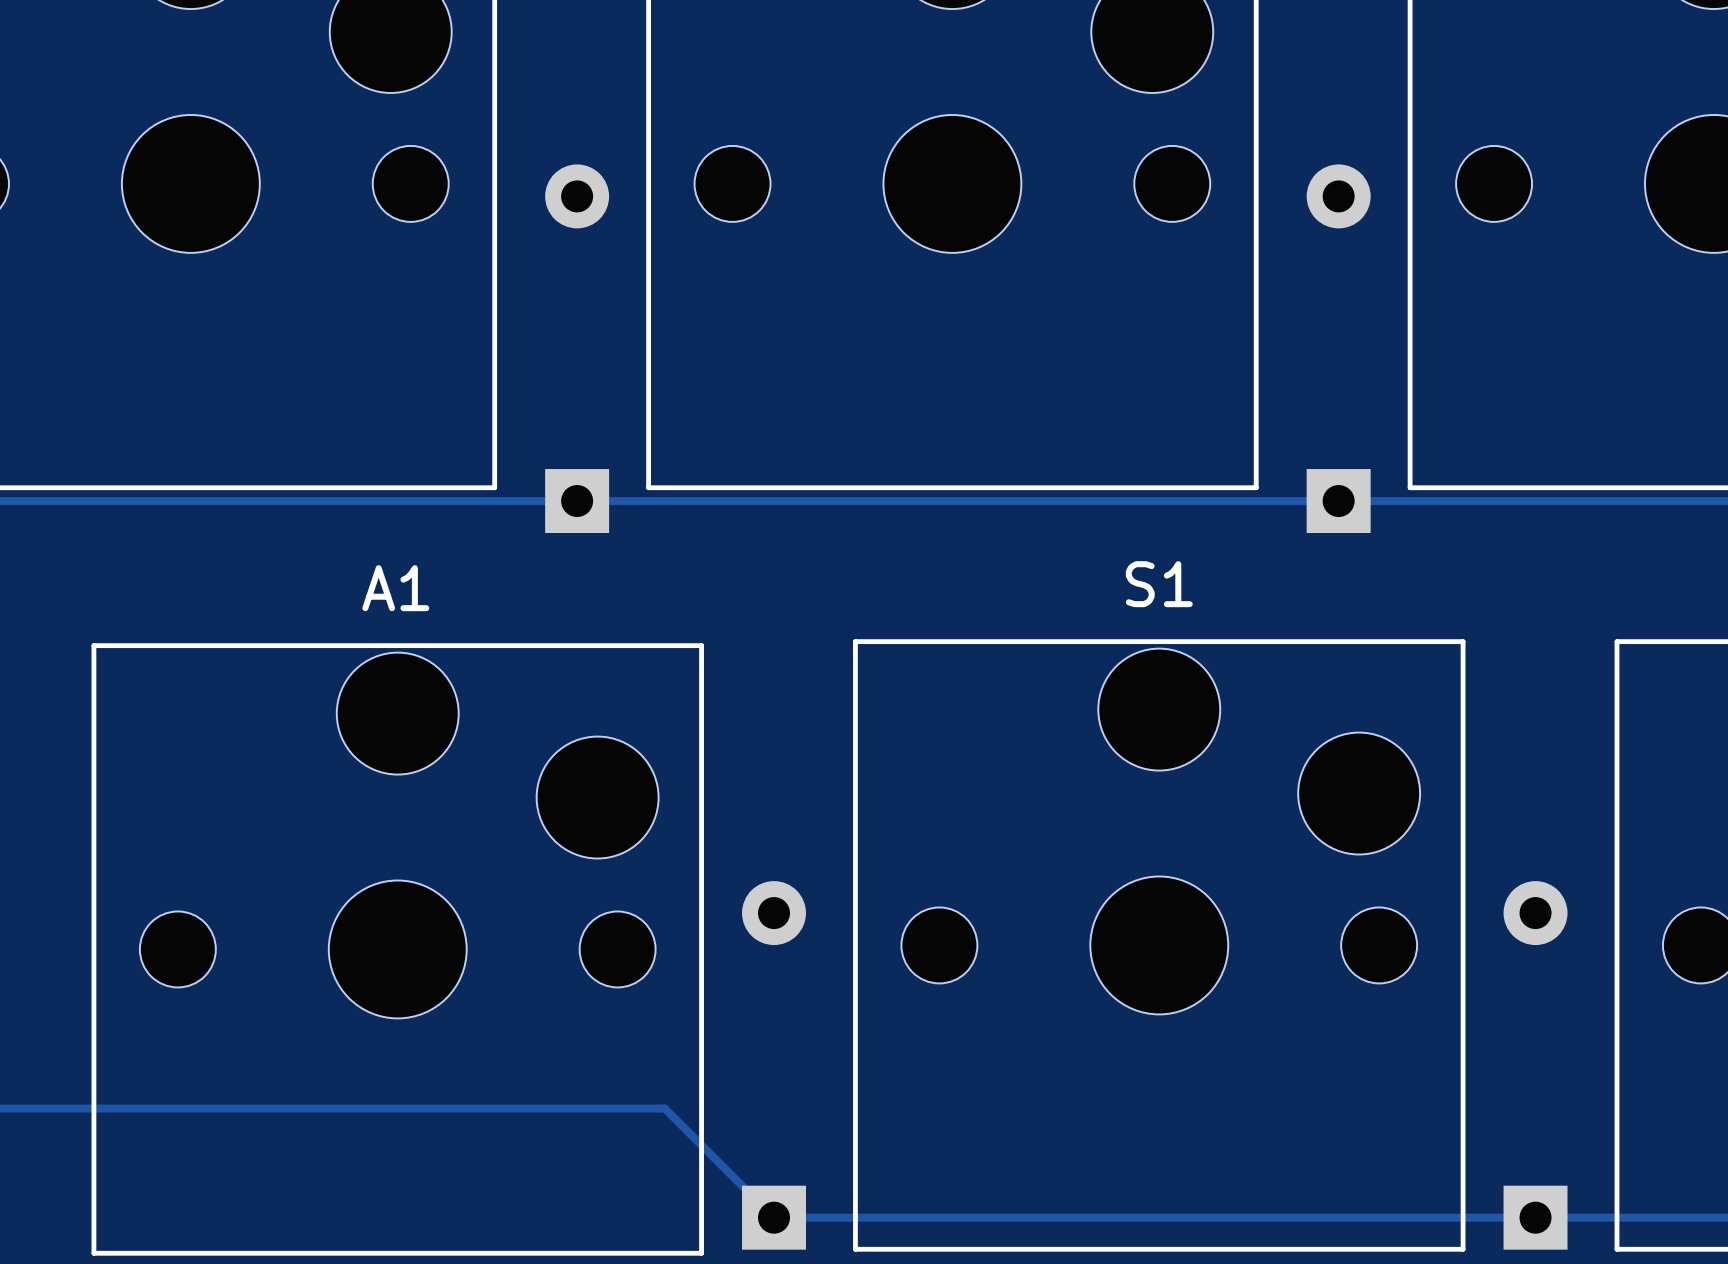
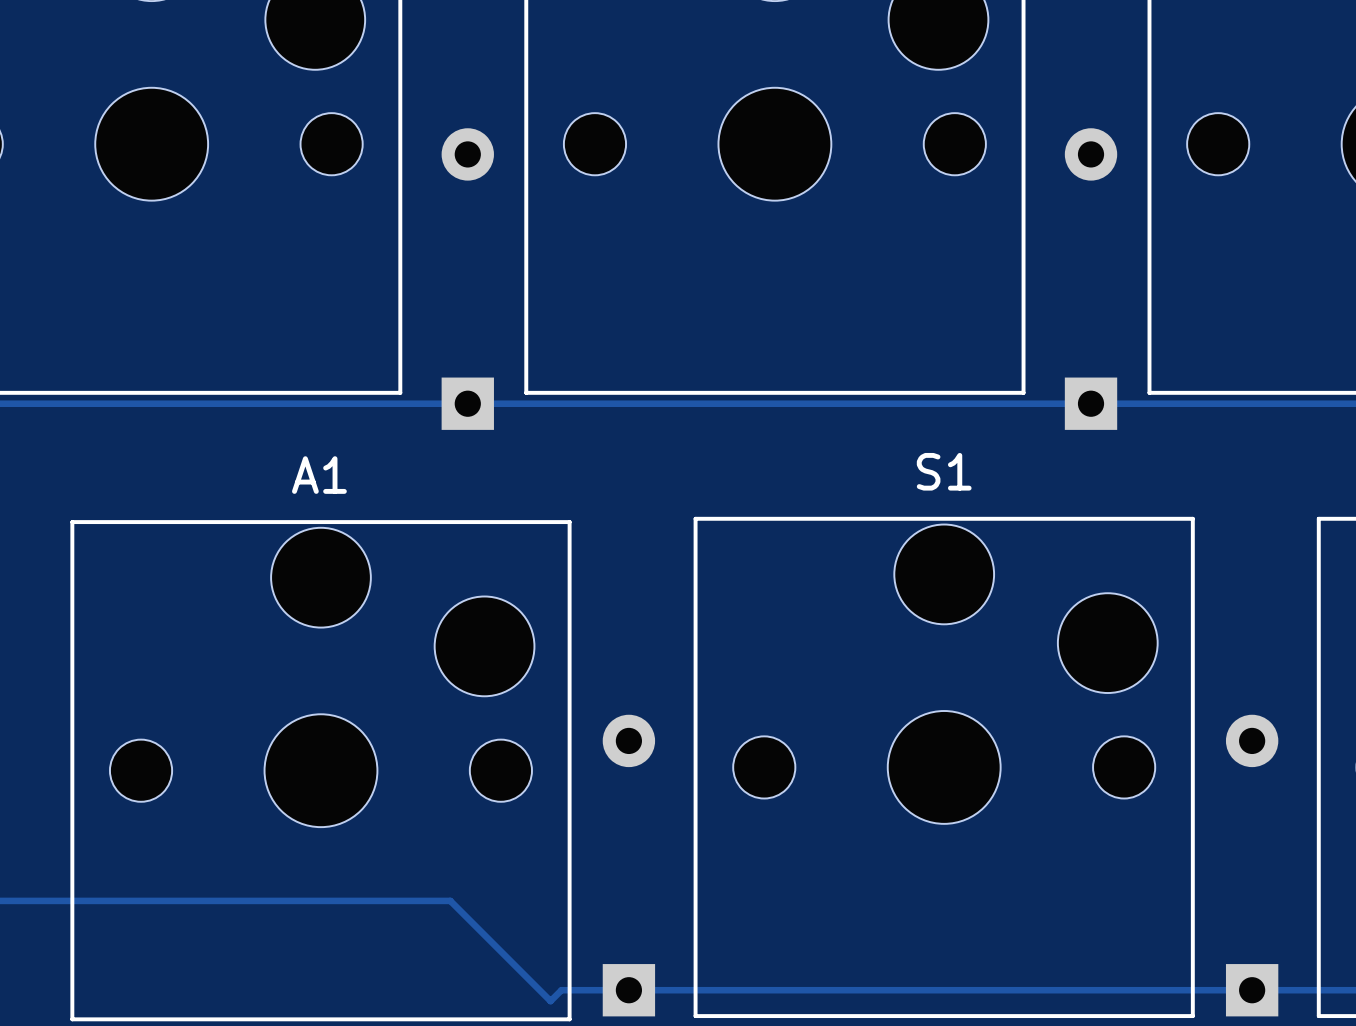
track: (555, 1108) (664, 1108) (774, 1217) -> (450, 900) (550, 1001) (561, 990) (628, 990)

